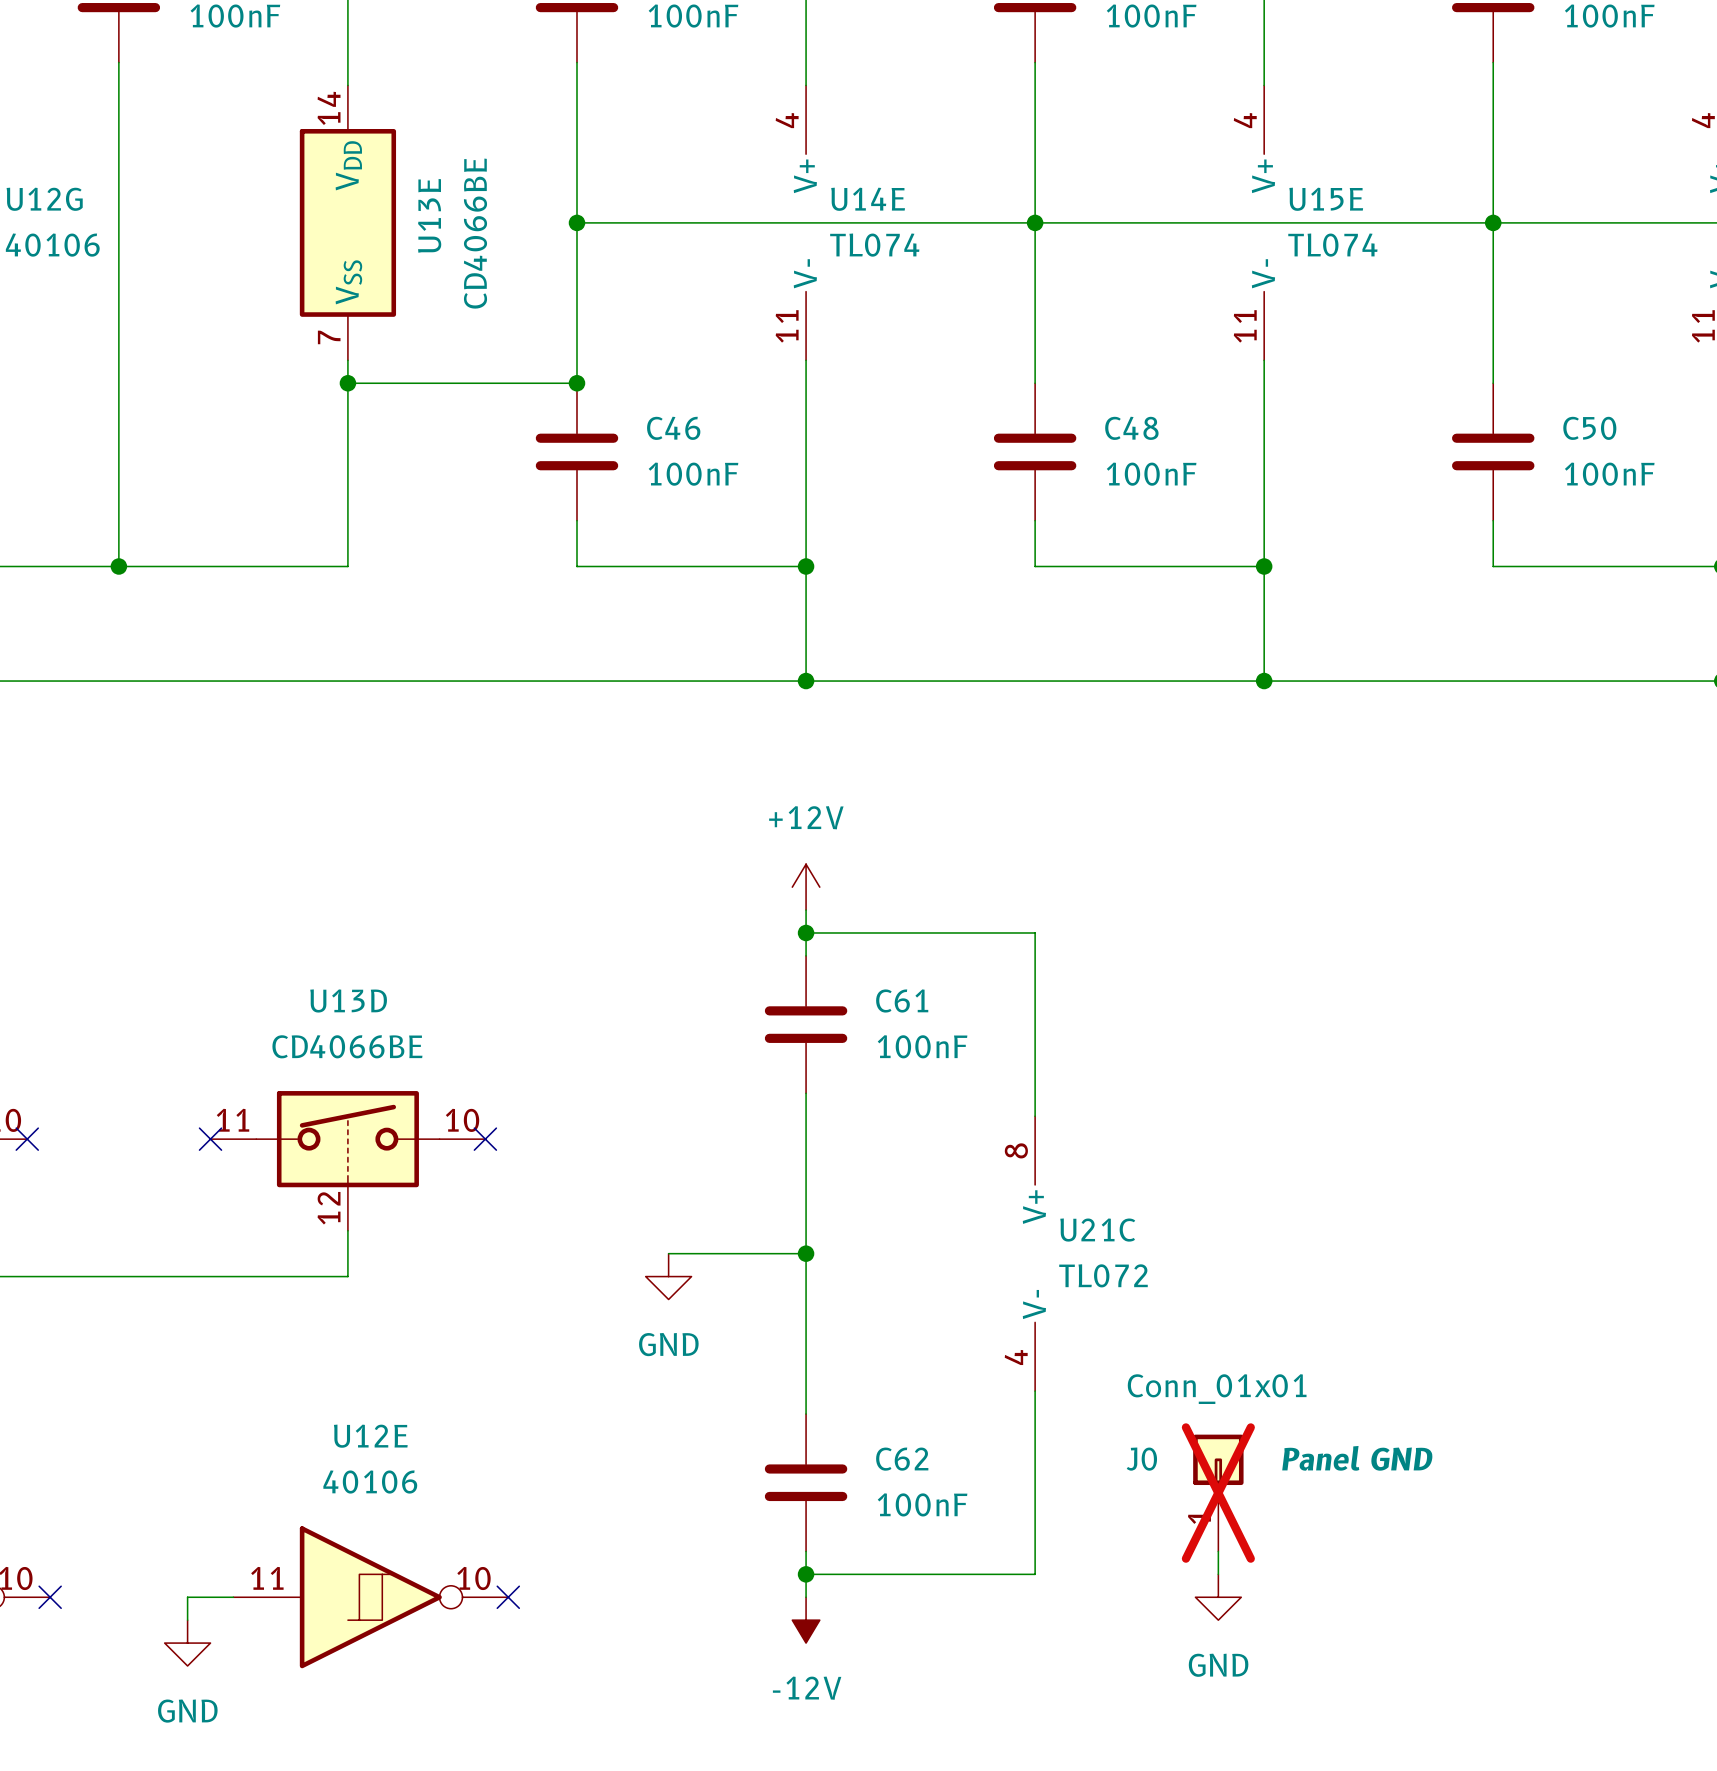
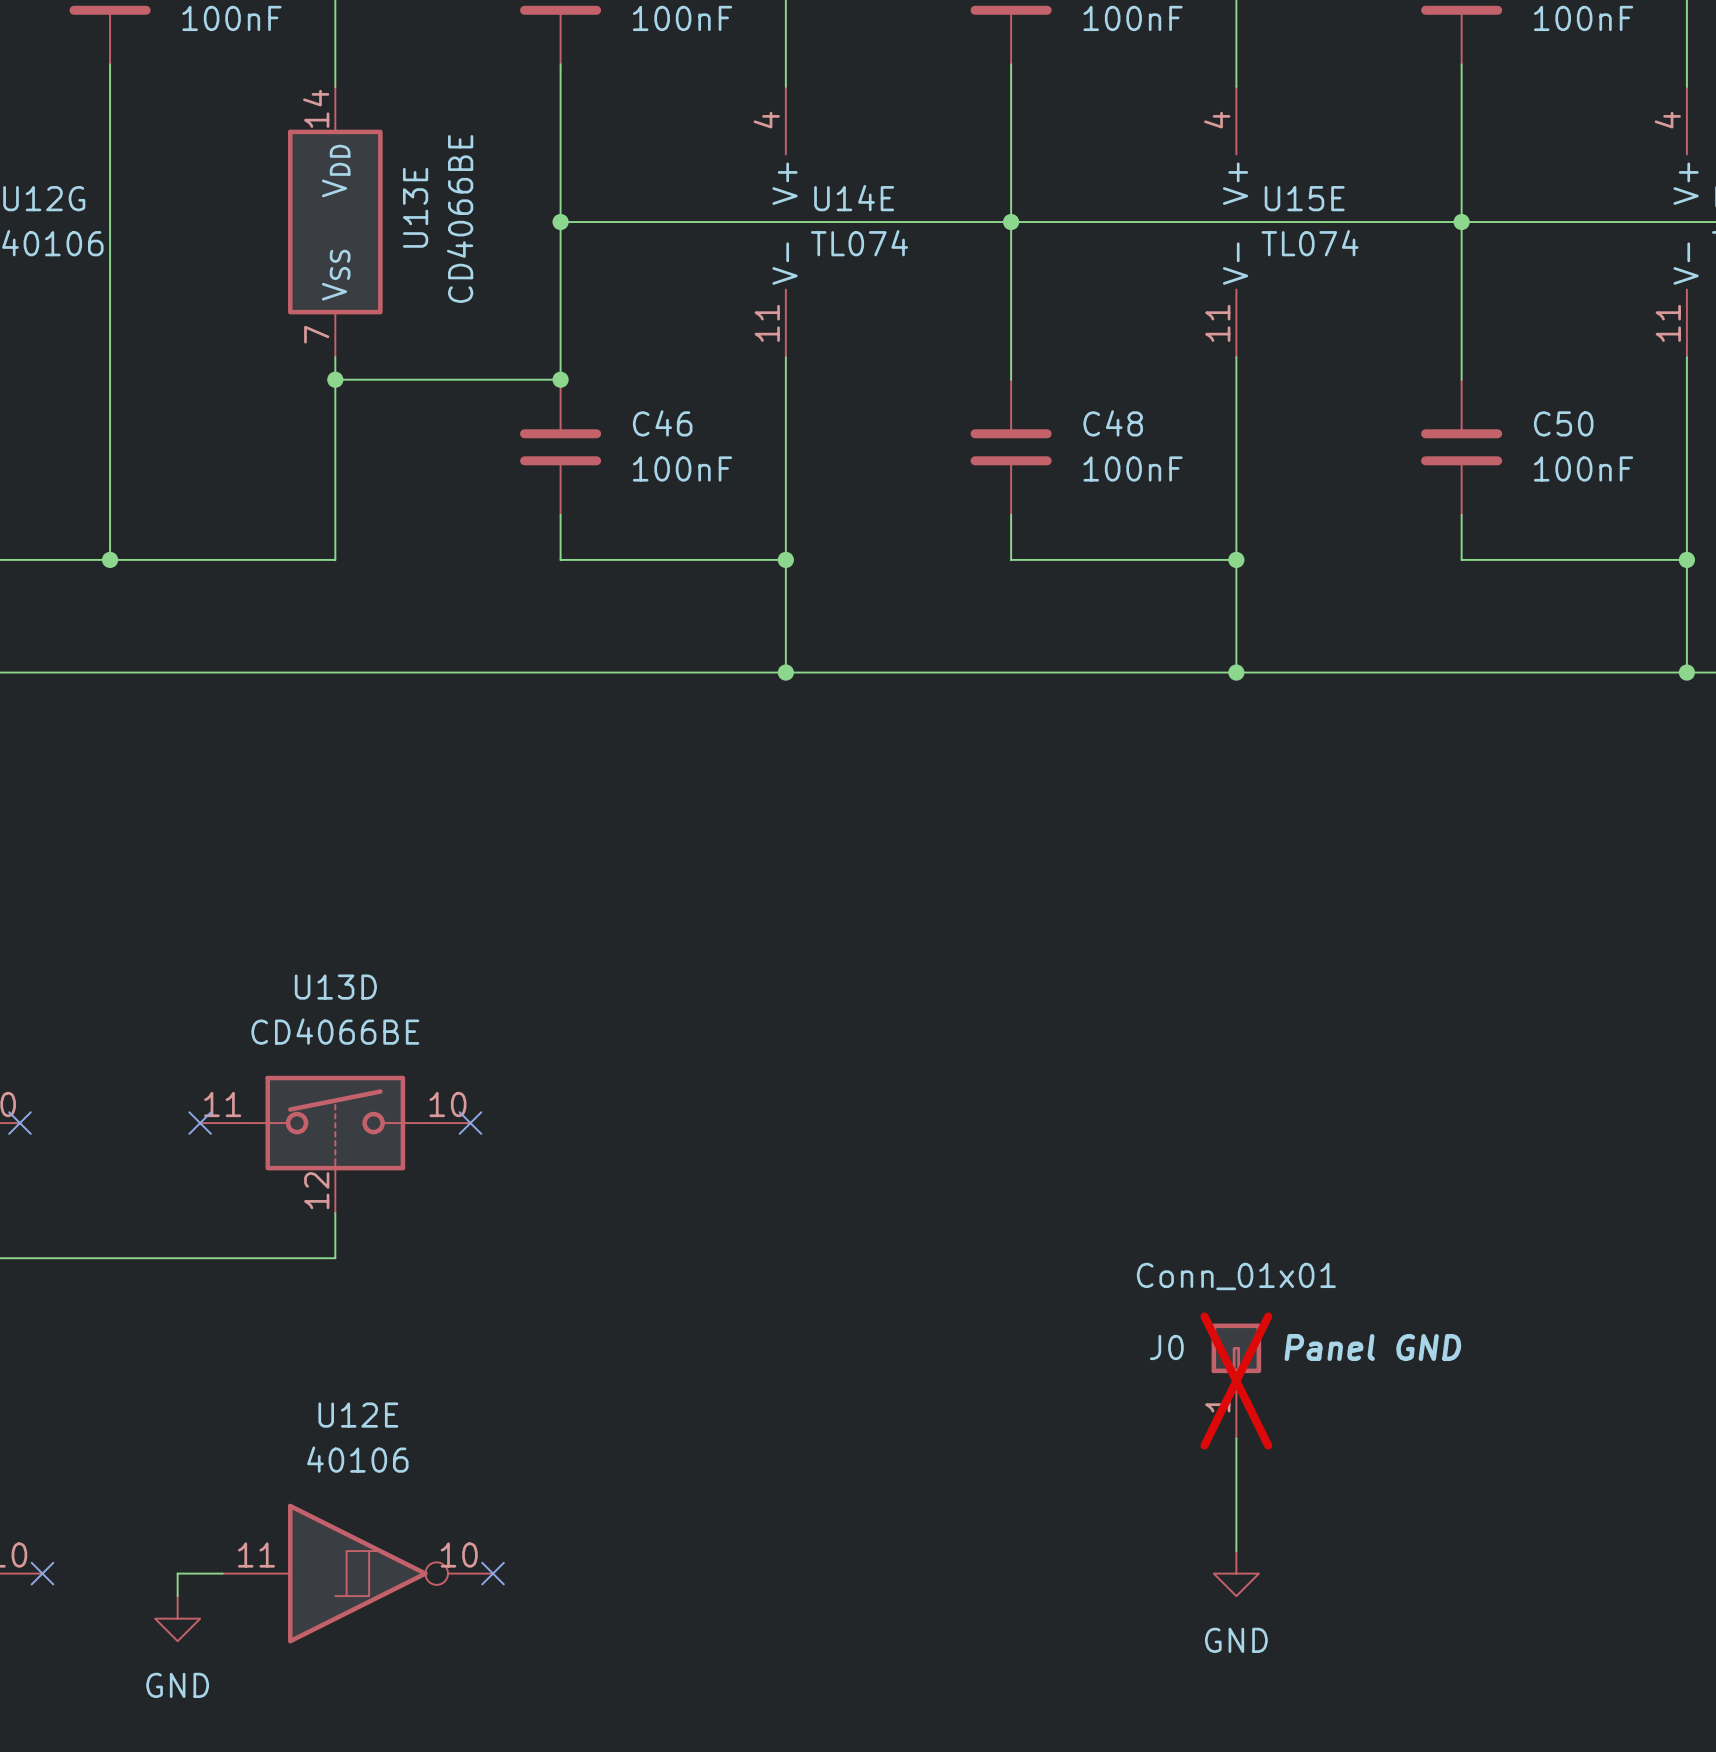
power symbol: +12V (806, 887) -> none
wire: (806, 910) (806, 955) -> none
wire: (806, 932) (1035, 932) (1035, 1116) -> none
junction: (806, 932) -> none
C61: 100nF (806, 1024) -> none
wire: (806, 1093) (806, 1414) -> none
wire: (668, 1253) (806, 1253) -> none
junction: (806, 1253) -> none
U21C: TL072 (1035, 1253) -> none
power symbol: GND (668, 1276) -> none
wire: (1035, 1391) (1035, 1574) (806, 1574) -> none
wire: none -> (1236, 1438) (1236, 1551)
C62: 100nF (806, 1482) -> none
J0 position: (1218, 1493) -> (1236, 1381)
wire: (806, 1551) (806, 1597) -> none
wire: (1218, 1551) (1218, 1574) -> none
junction: (806, 1574) -> none
power symbol position: GND (1218, 1597) -> GND (1236, 1573)
power symbol: -12V (806, 1620) -> none

